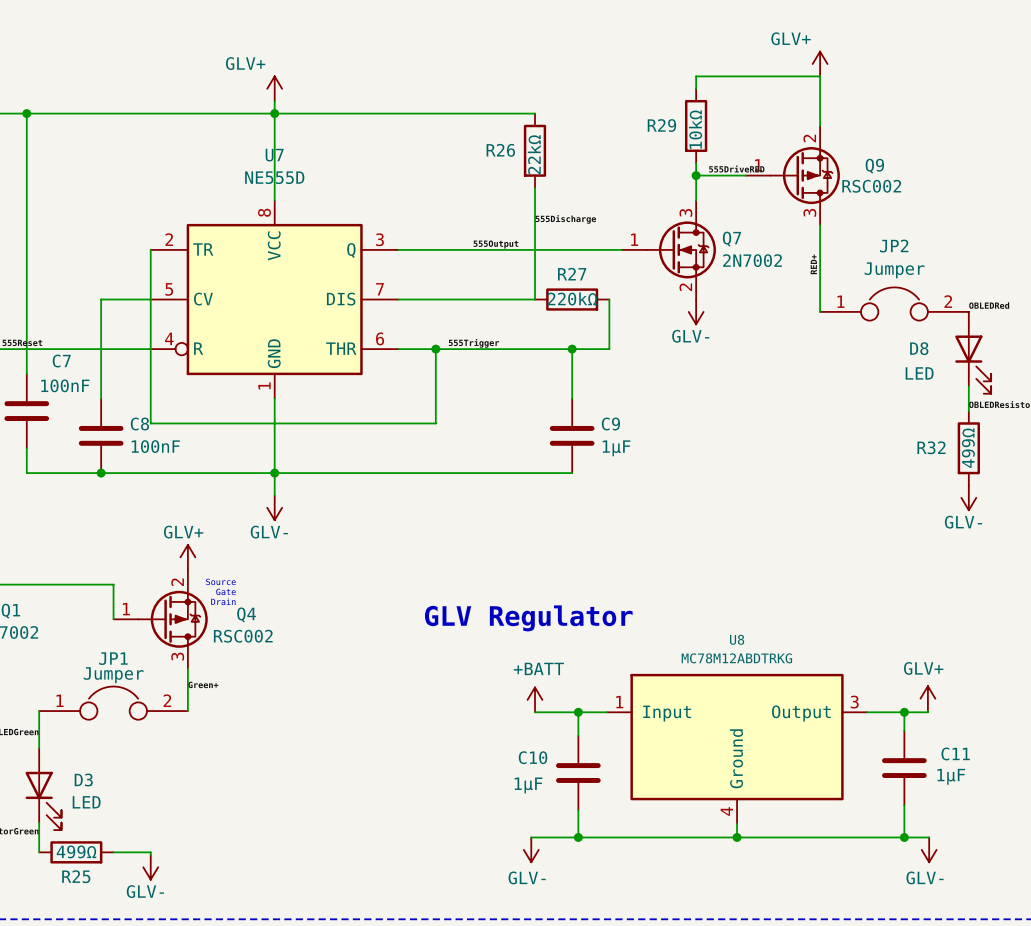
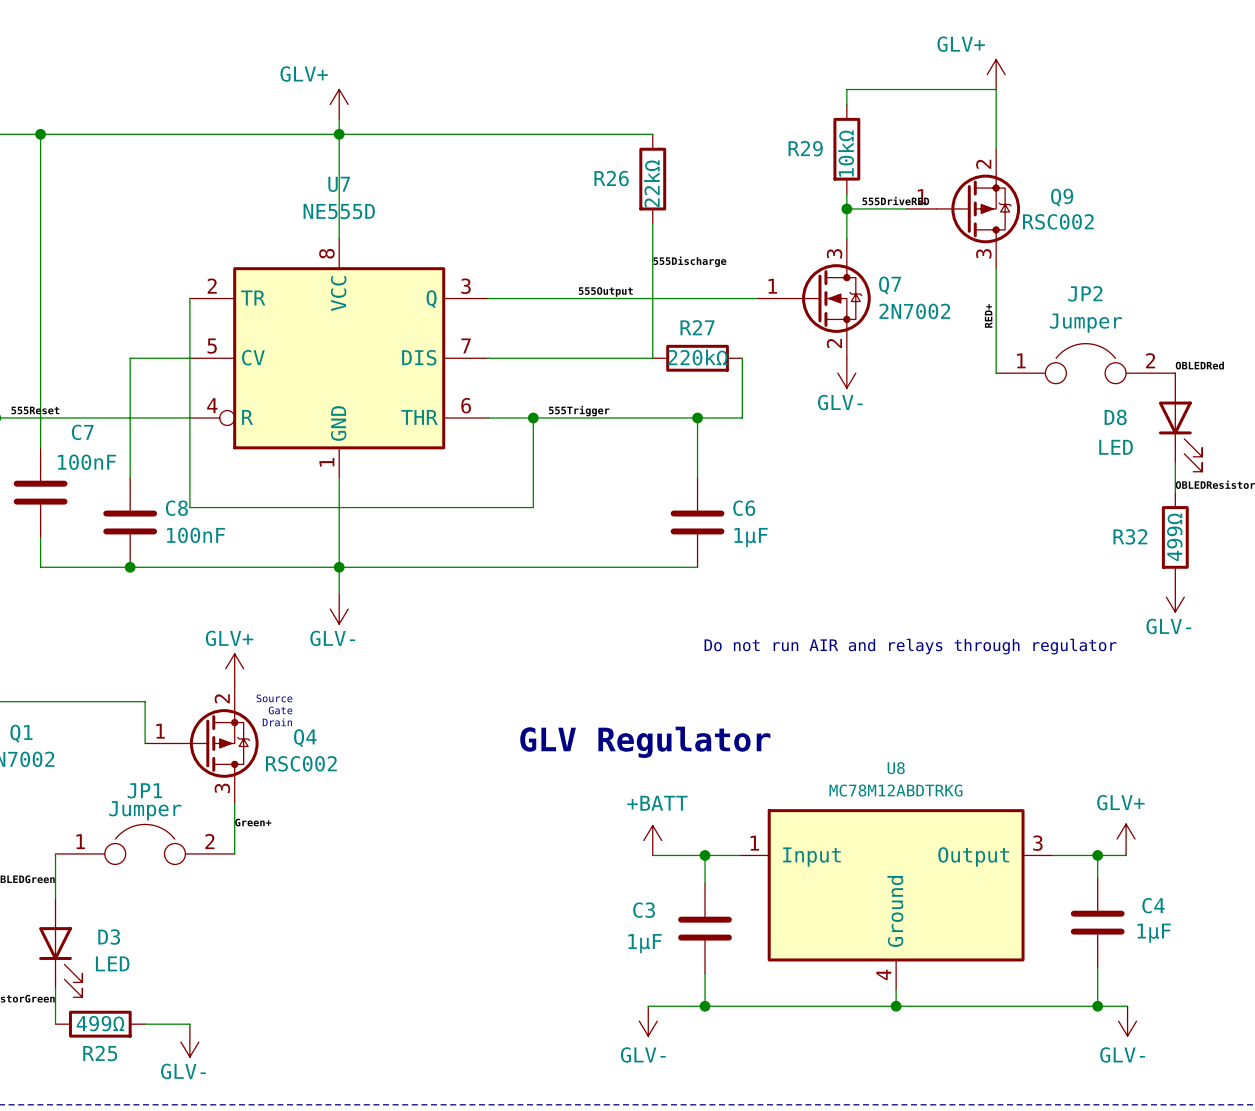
C9 name: C9 (610, 424) -> C6 (744, 508)
text: none -> Do not run AIR and relays through regulator (910, 646)
C11 name: C11 (955, 753) -> C4 (1153, 905)
C10 name: C10 (533, 757) -> C3 (644, 910)

